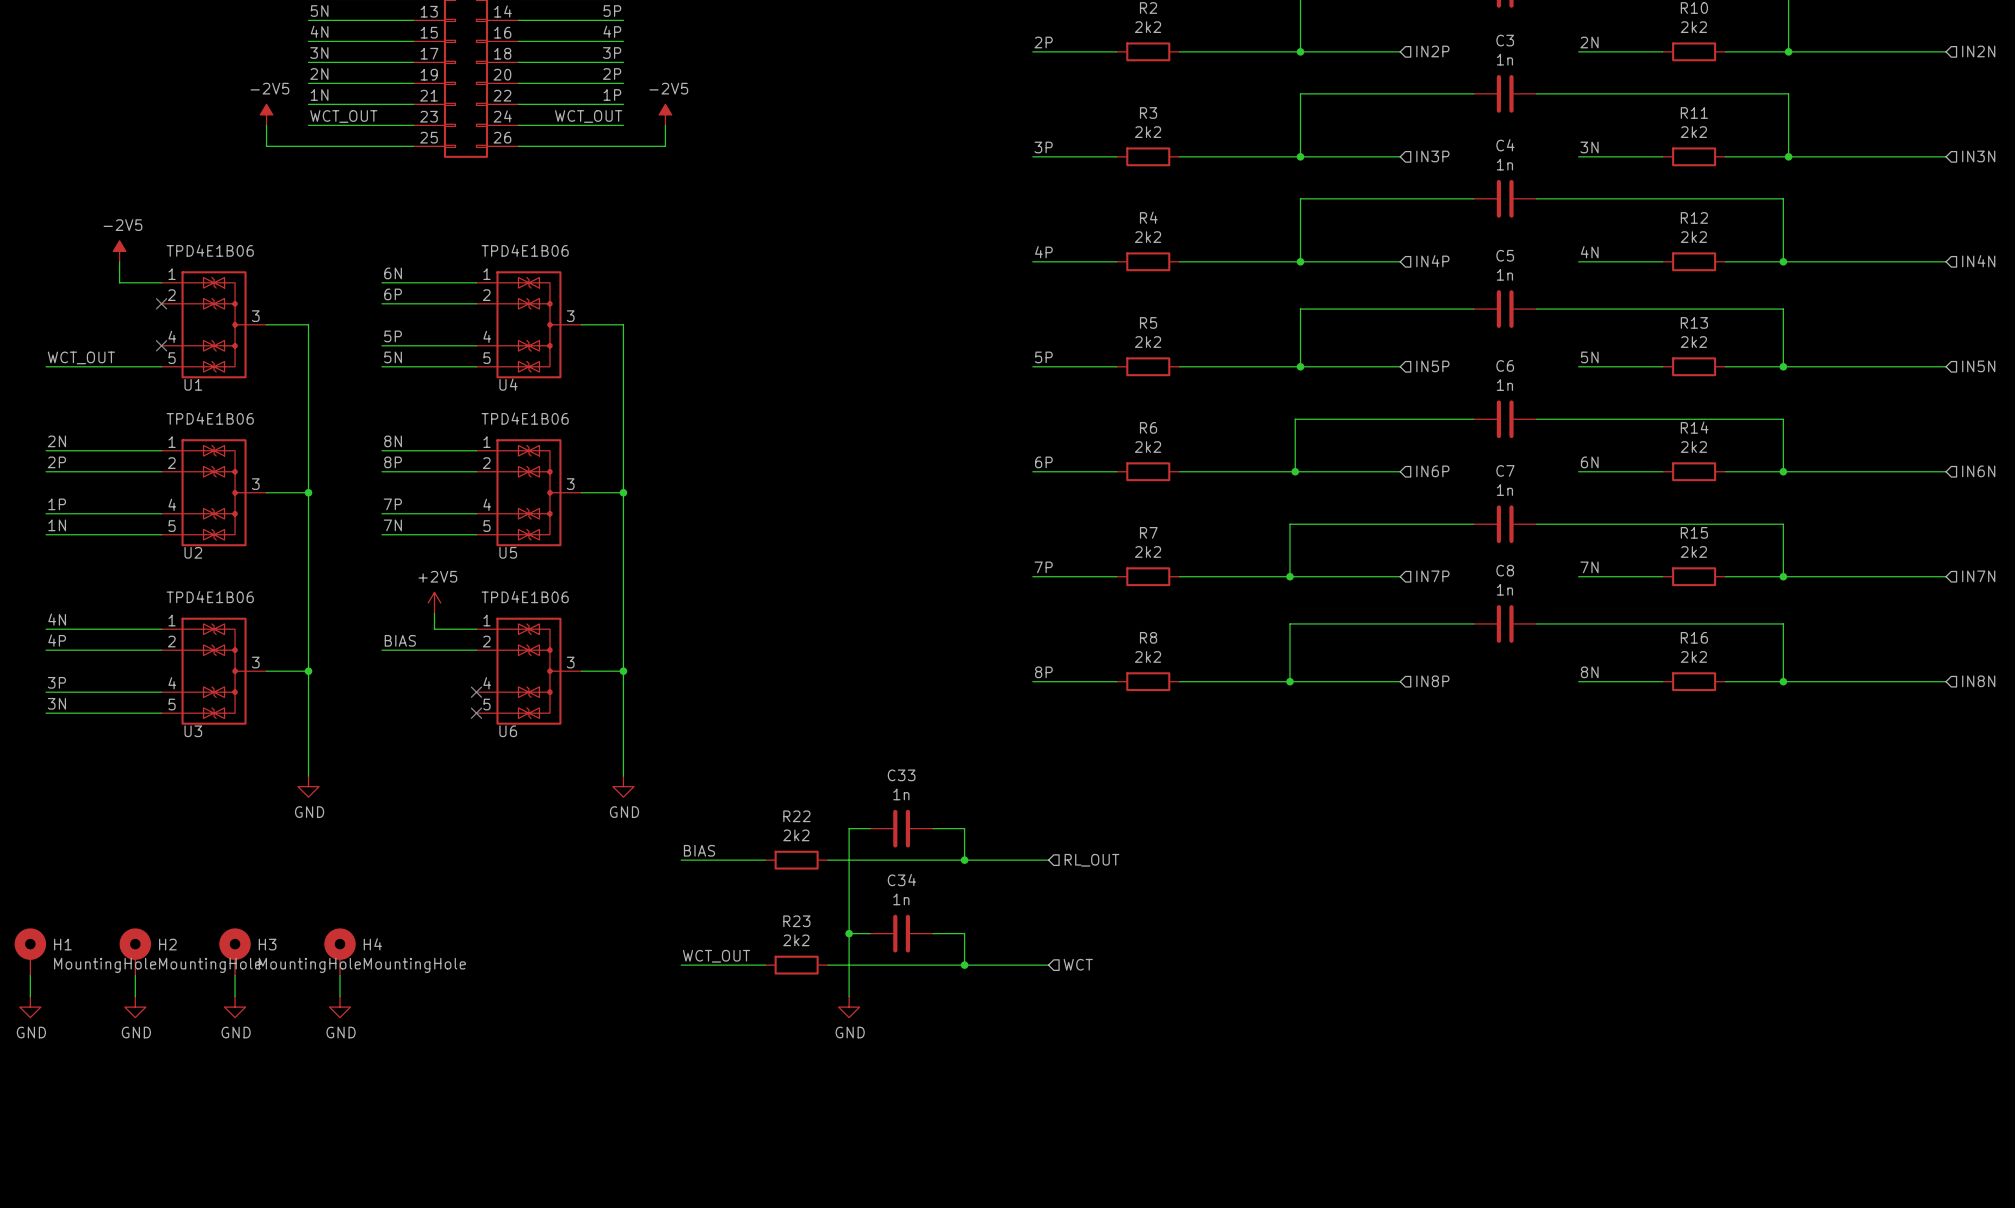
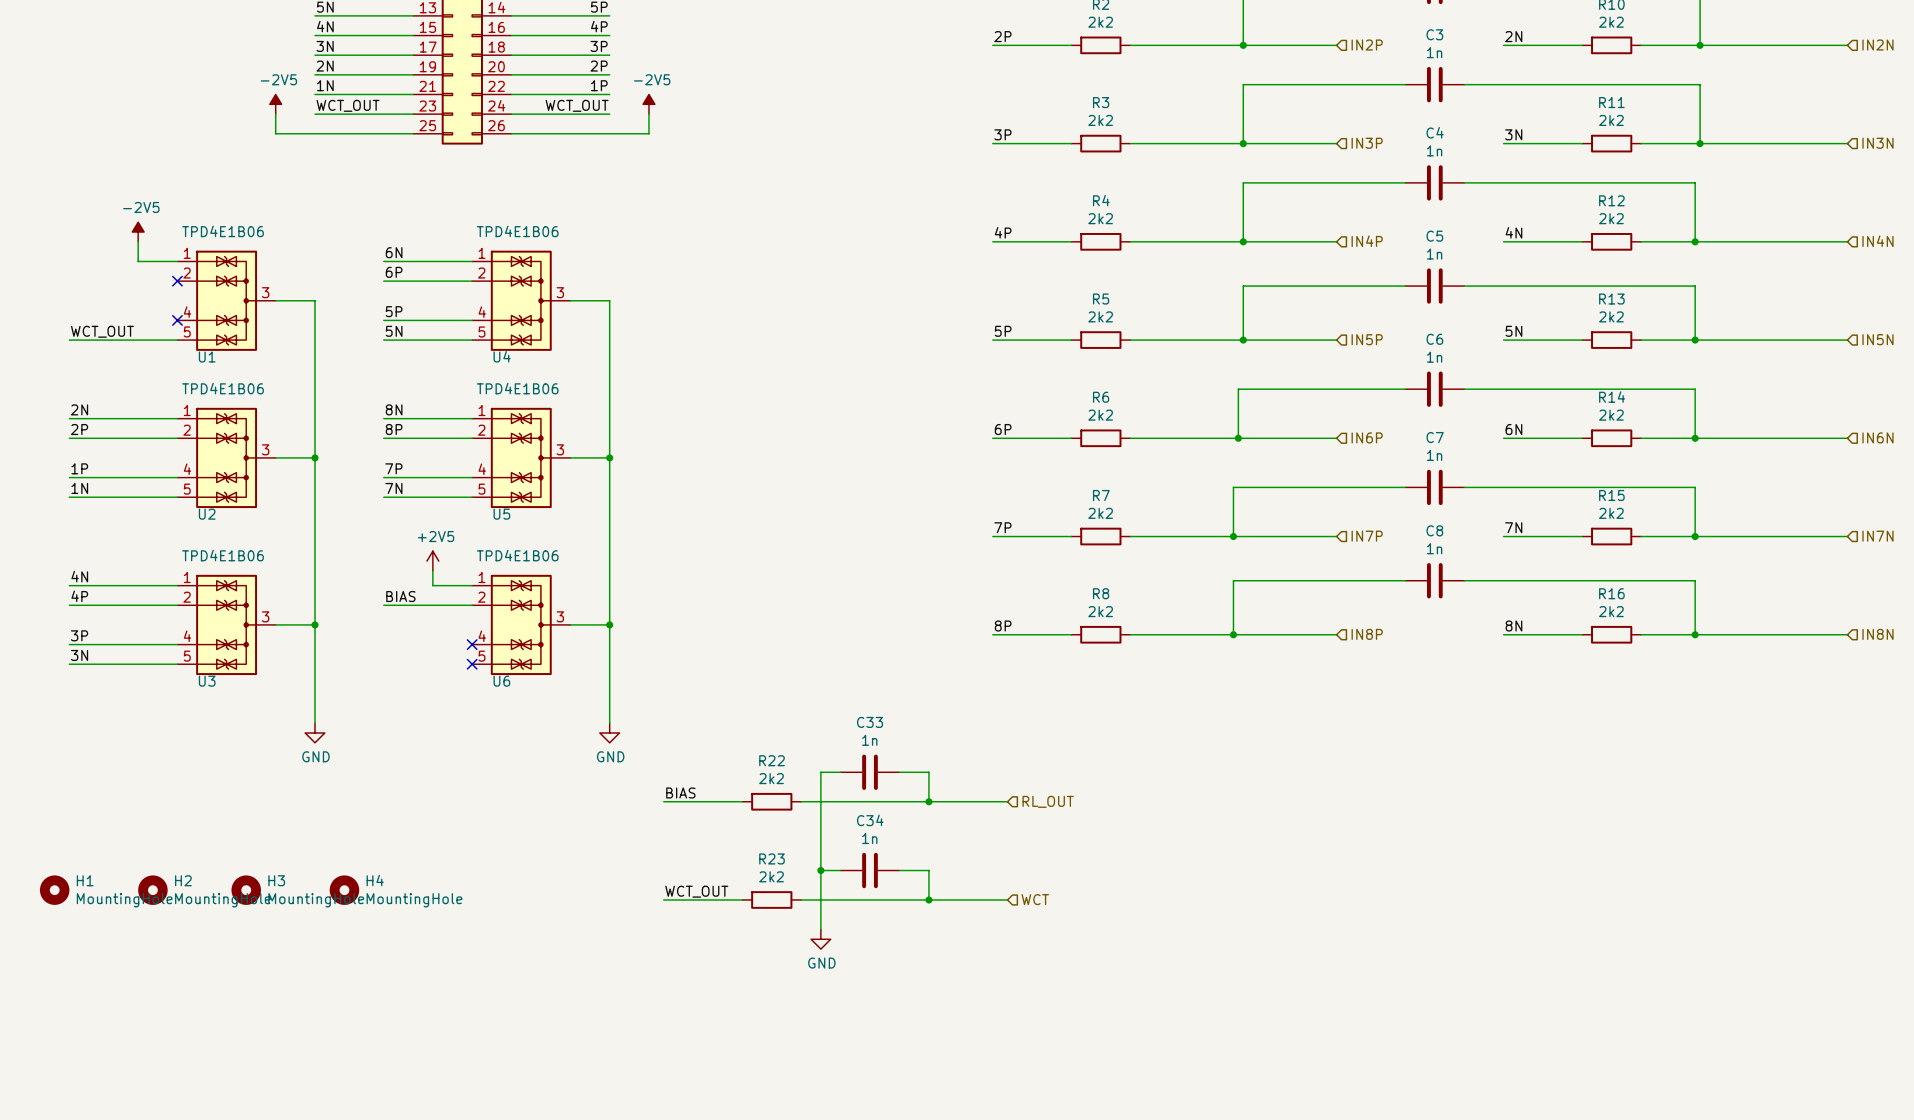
H1 symbol: [14, 928, 47, 976] -> [39, 875, 70, 905]
H2 symbol: [119, 928, 152, 976] -> [138, 875, 168, 905]
H3 symbol: [219, 928, 251, 976] -> [231, 875, 261, 905]
H4 symbol: [324, 928, 356, 976] -> [329, 875, 360, 905]
wire: (30, 975) (30, 996) -> none
wire: (135, 975) (135, 996) -> none
wire: (235, 975) (235, 996) -> none
wire: (340, 975) (340, 996) -> none
power symbol: GND (30, 1007) -> none
power symbol: GND (135, 1007) -> none
power symbol: GND (235, 1007) -> none
power symbol: GND (340, 1007) -> none

